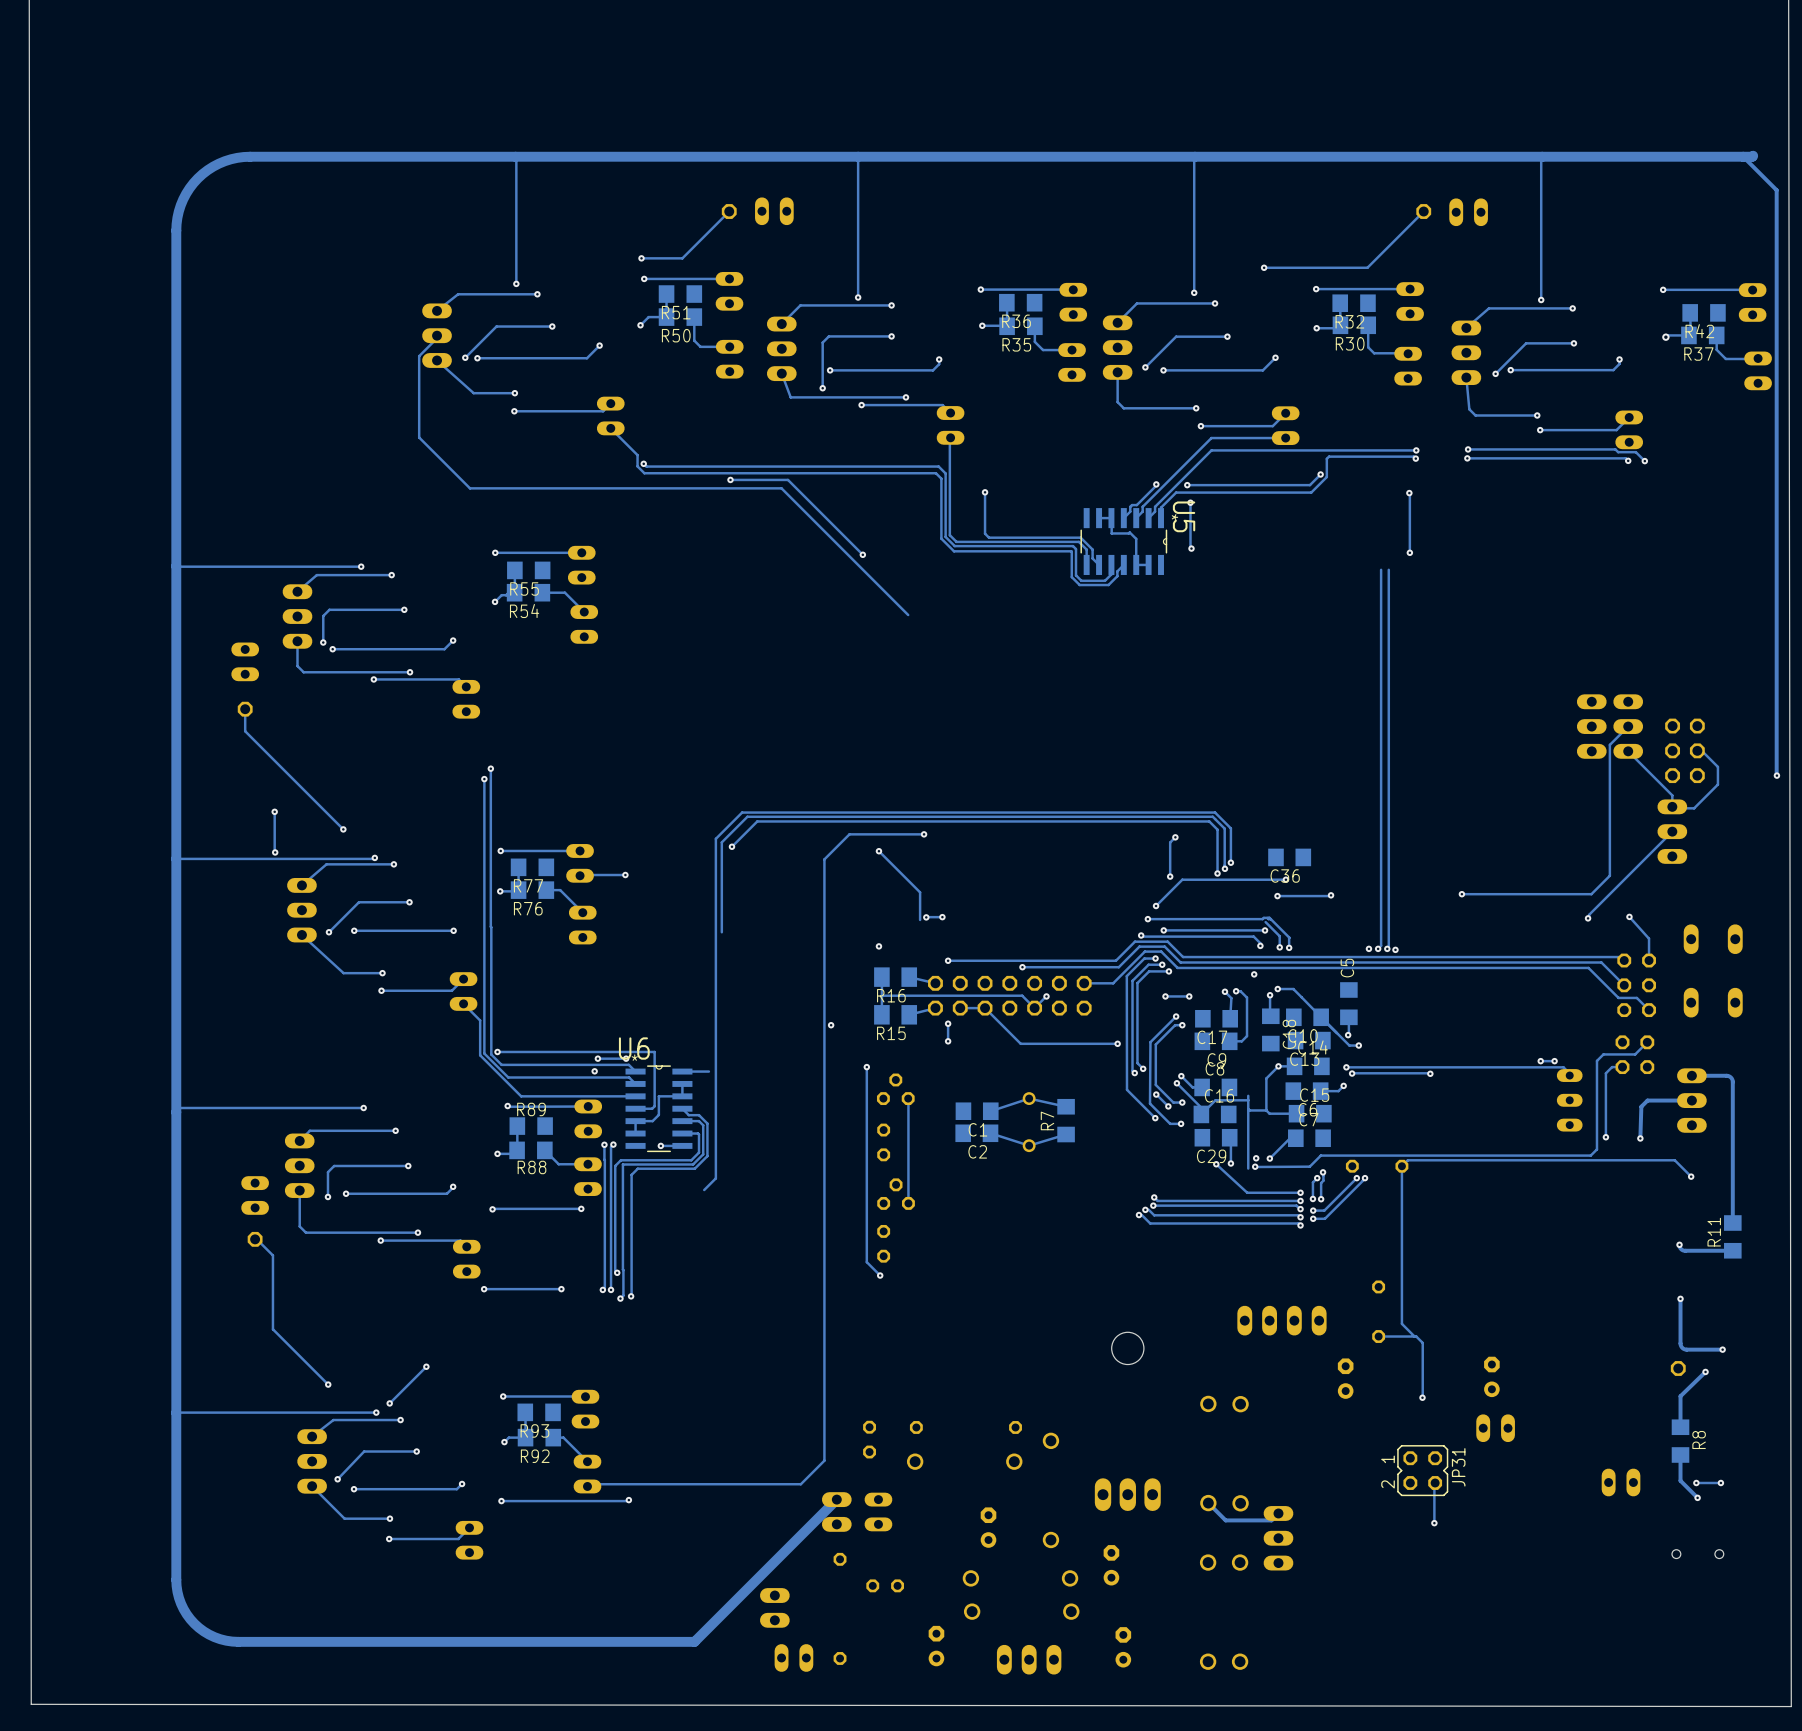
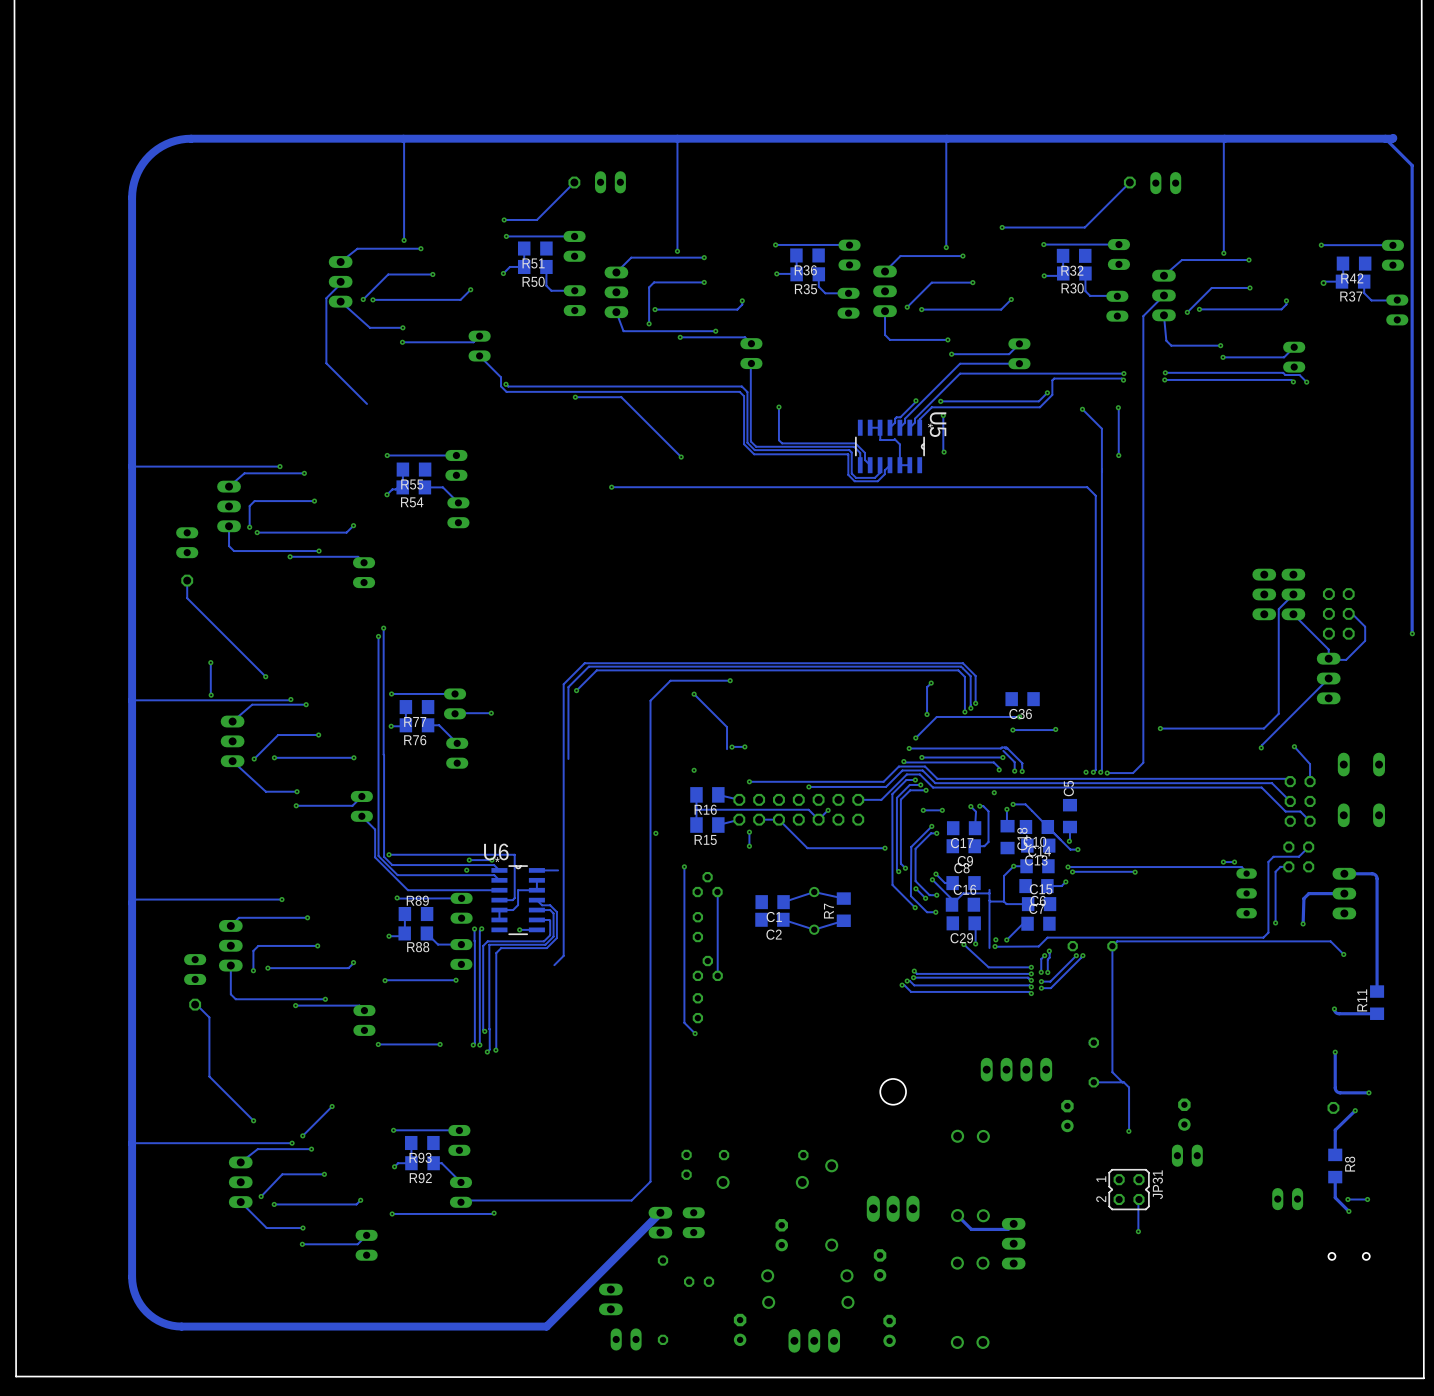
track: none -> (1163, 295) (1143, 316) (1143, 762) (1133, 773) (1107, 773)
track: (470, 488) (781, 488) (908, 615) -> none
track: none -> (1082, 409) (1101, 428) (1101, 469)
via: none -> (1082, 409)
track: (1381, 569) (1381, 603) -> (611, 487) (1087, 487) (1095, 495)
via: none -> (611, 487)

